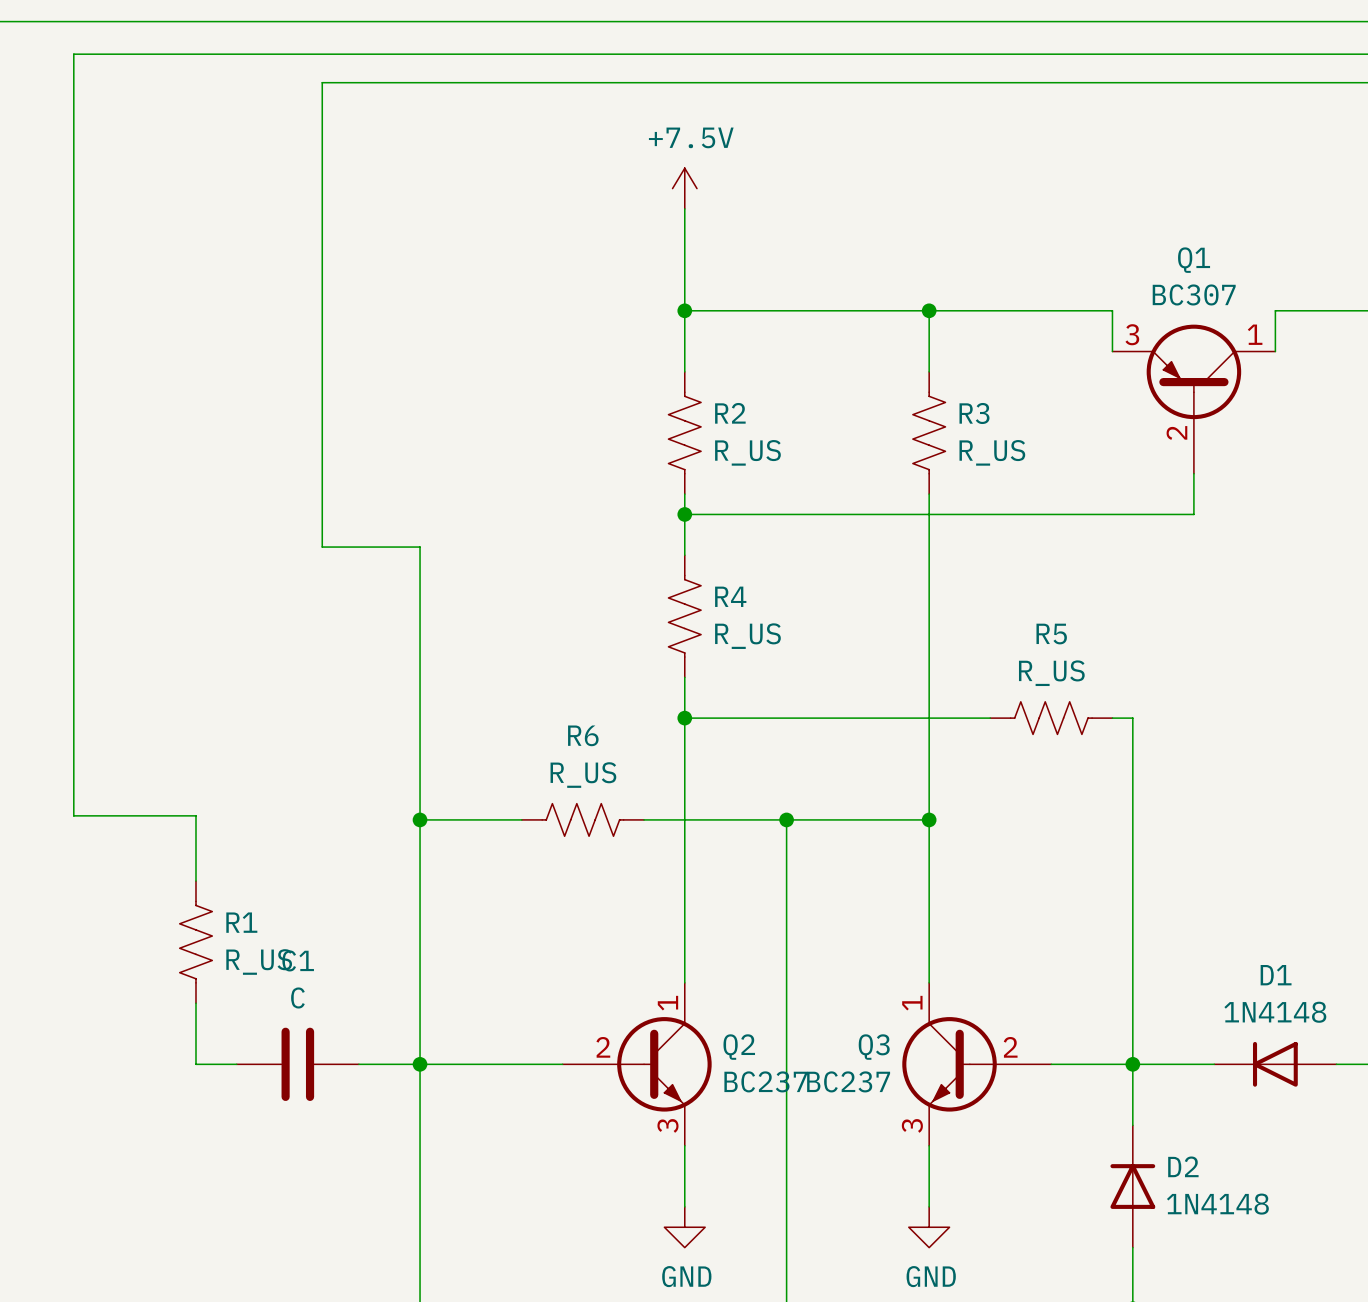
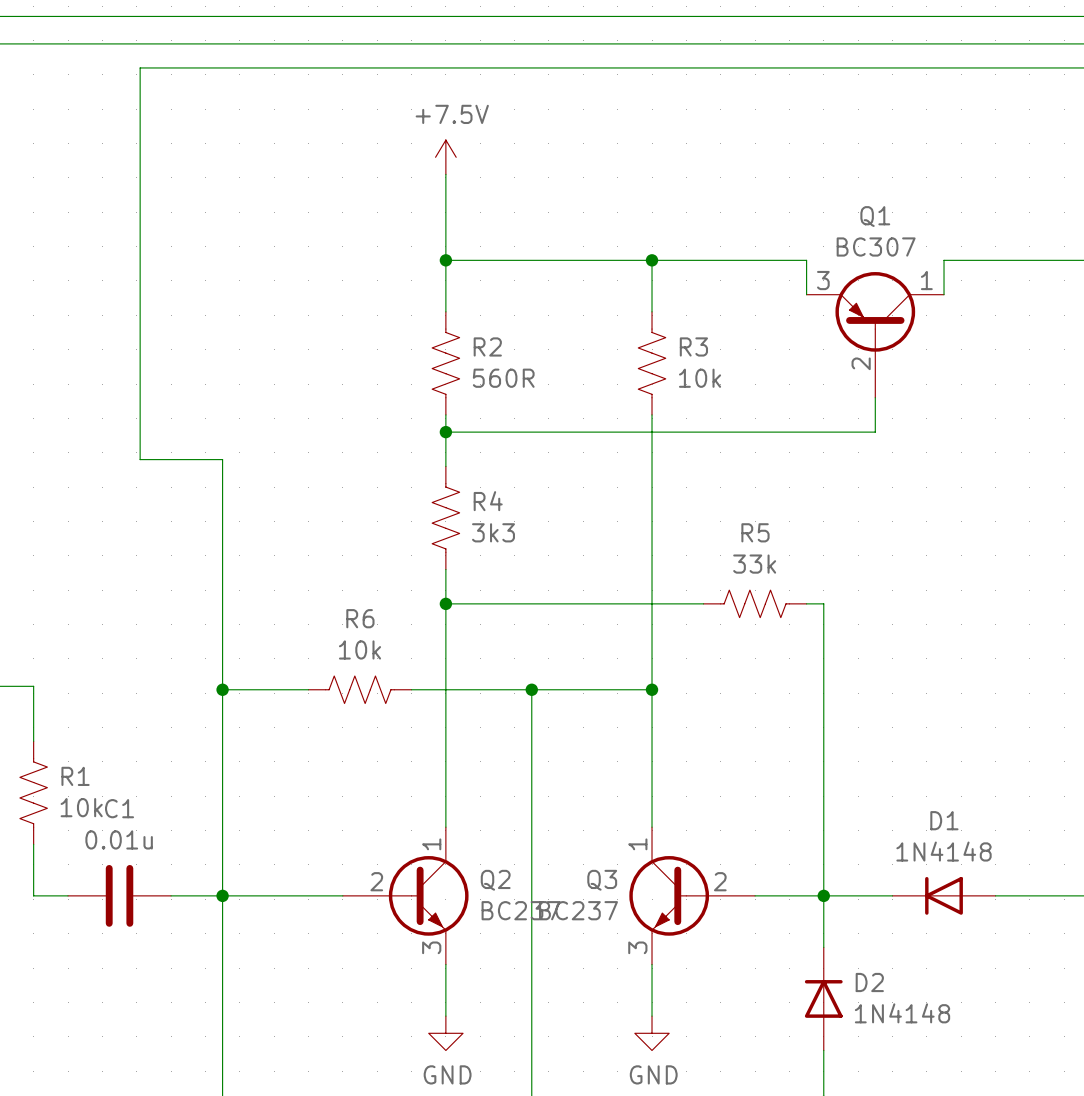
R2 value: R_US (747, 452) -> 560R (503, 378)
R3 value: R_US (992, 452) -> 10k (700, 378)
R4 value: R_US (747, 636) -> 3k3 (493, 532)
R5 value: R_US (1051, 673) -> 33k (754, 564)
R6 value: R_US (583, 775) -> 10k (360, 649)
R1 value: R_US (259, 961) -> 10k (81, 807)
C1 value: C (297, 997) -> 0.01u (119, 839)

